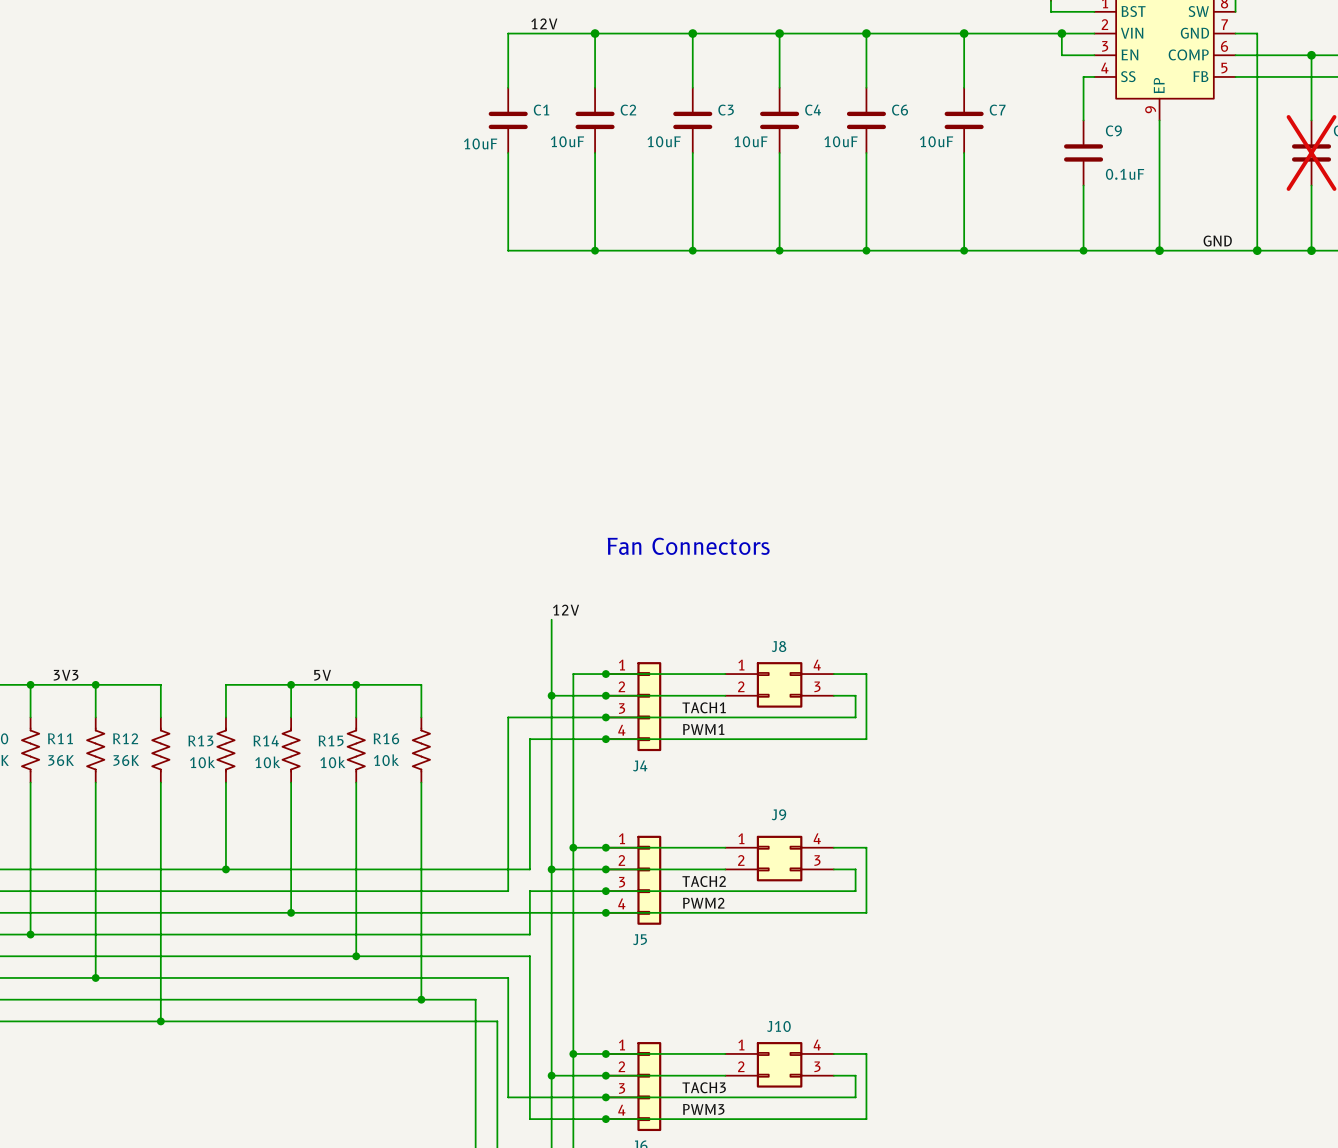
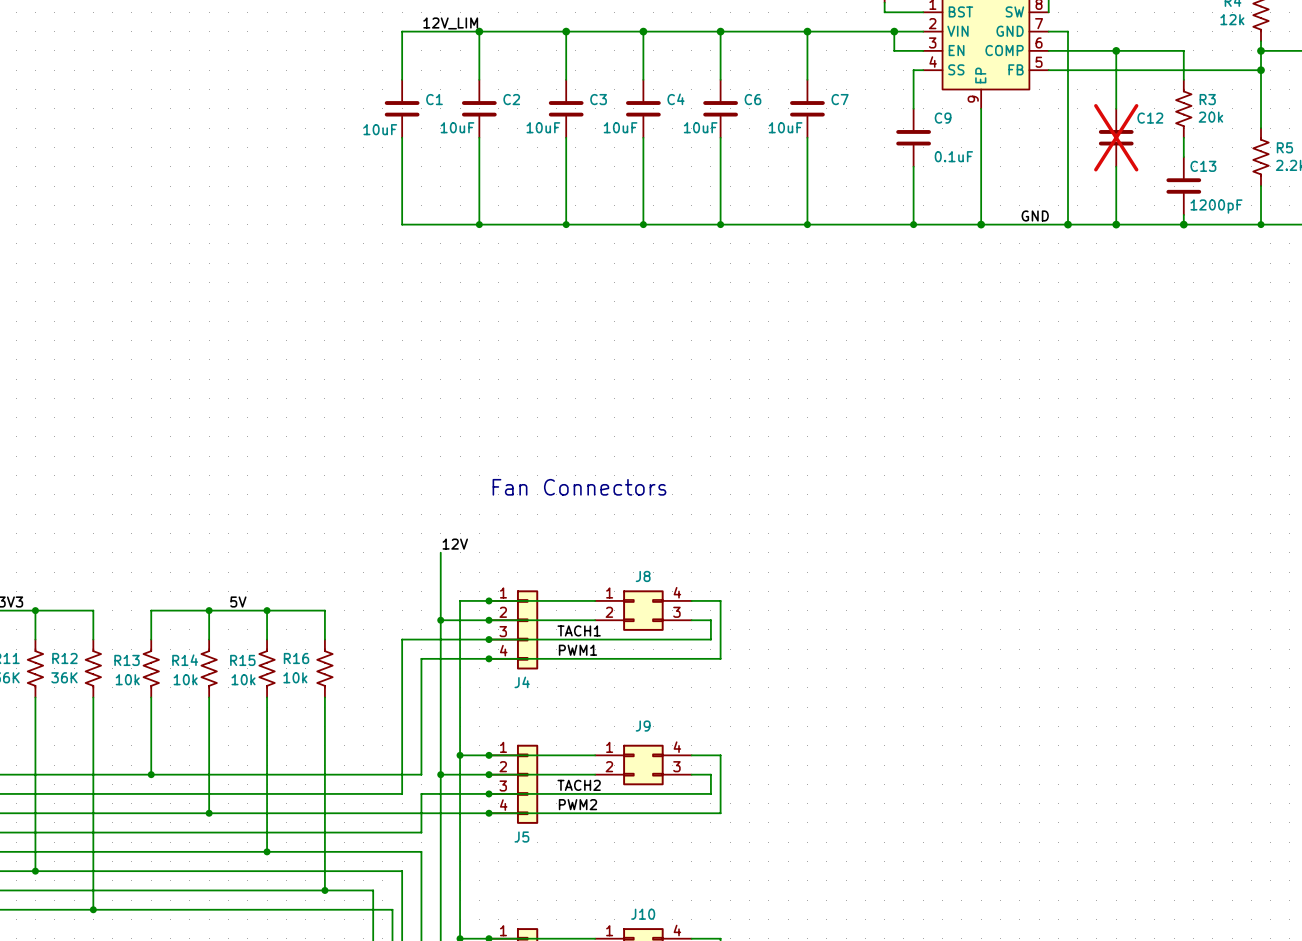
label: 12V (544, 23) -> 12V_LIM (450, 23)

